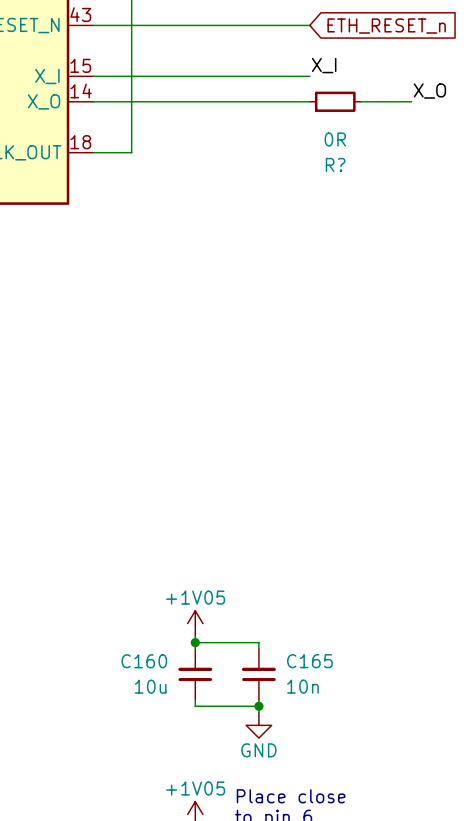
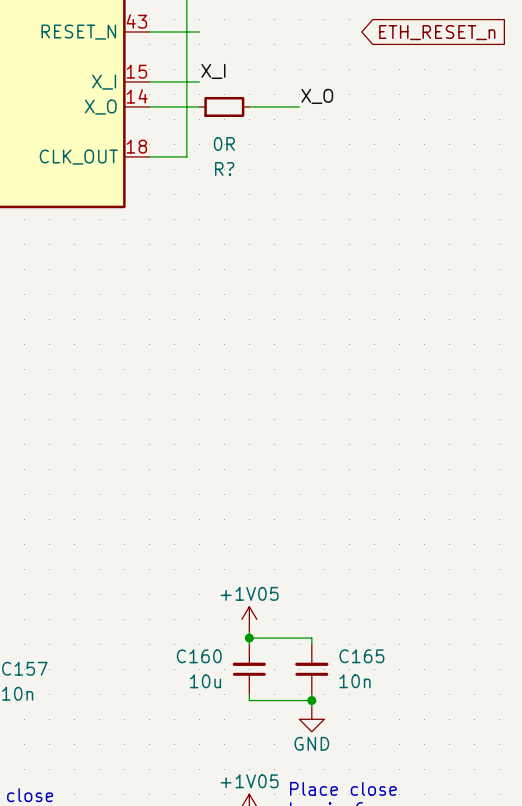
wire: (144, 25) (309, 25) -> none
label position: X_I (324, 65) -> X_I (213, 71)
wire: (144, 76) (309, 76) -> none
label position: X_O (429, 91) -> X_O (317, 96)
wire: (144, 101) (195, 101) -> none
wire: (246, 101) (309, 101) -> none
R? position: (335, 101) -> (224, 106)
wire: (360, 101) (411, 101) -> none

